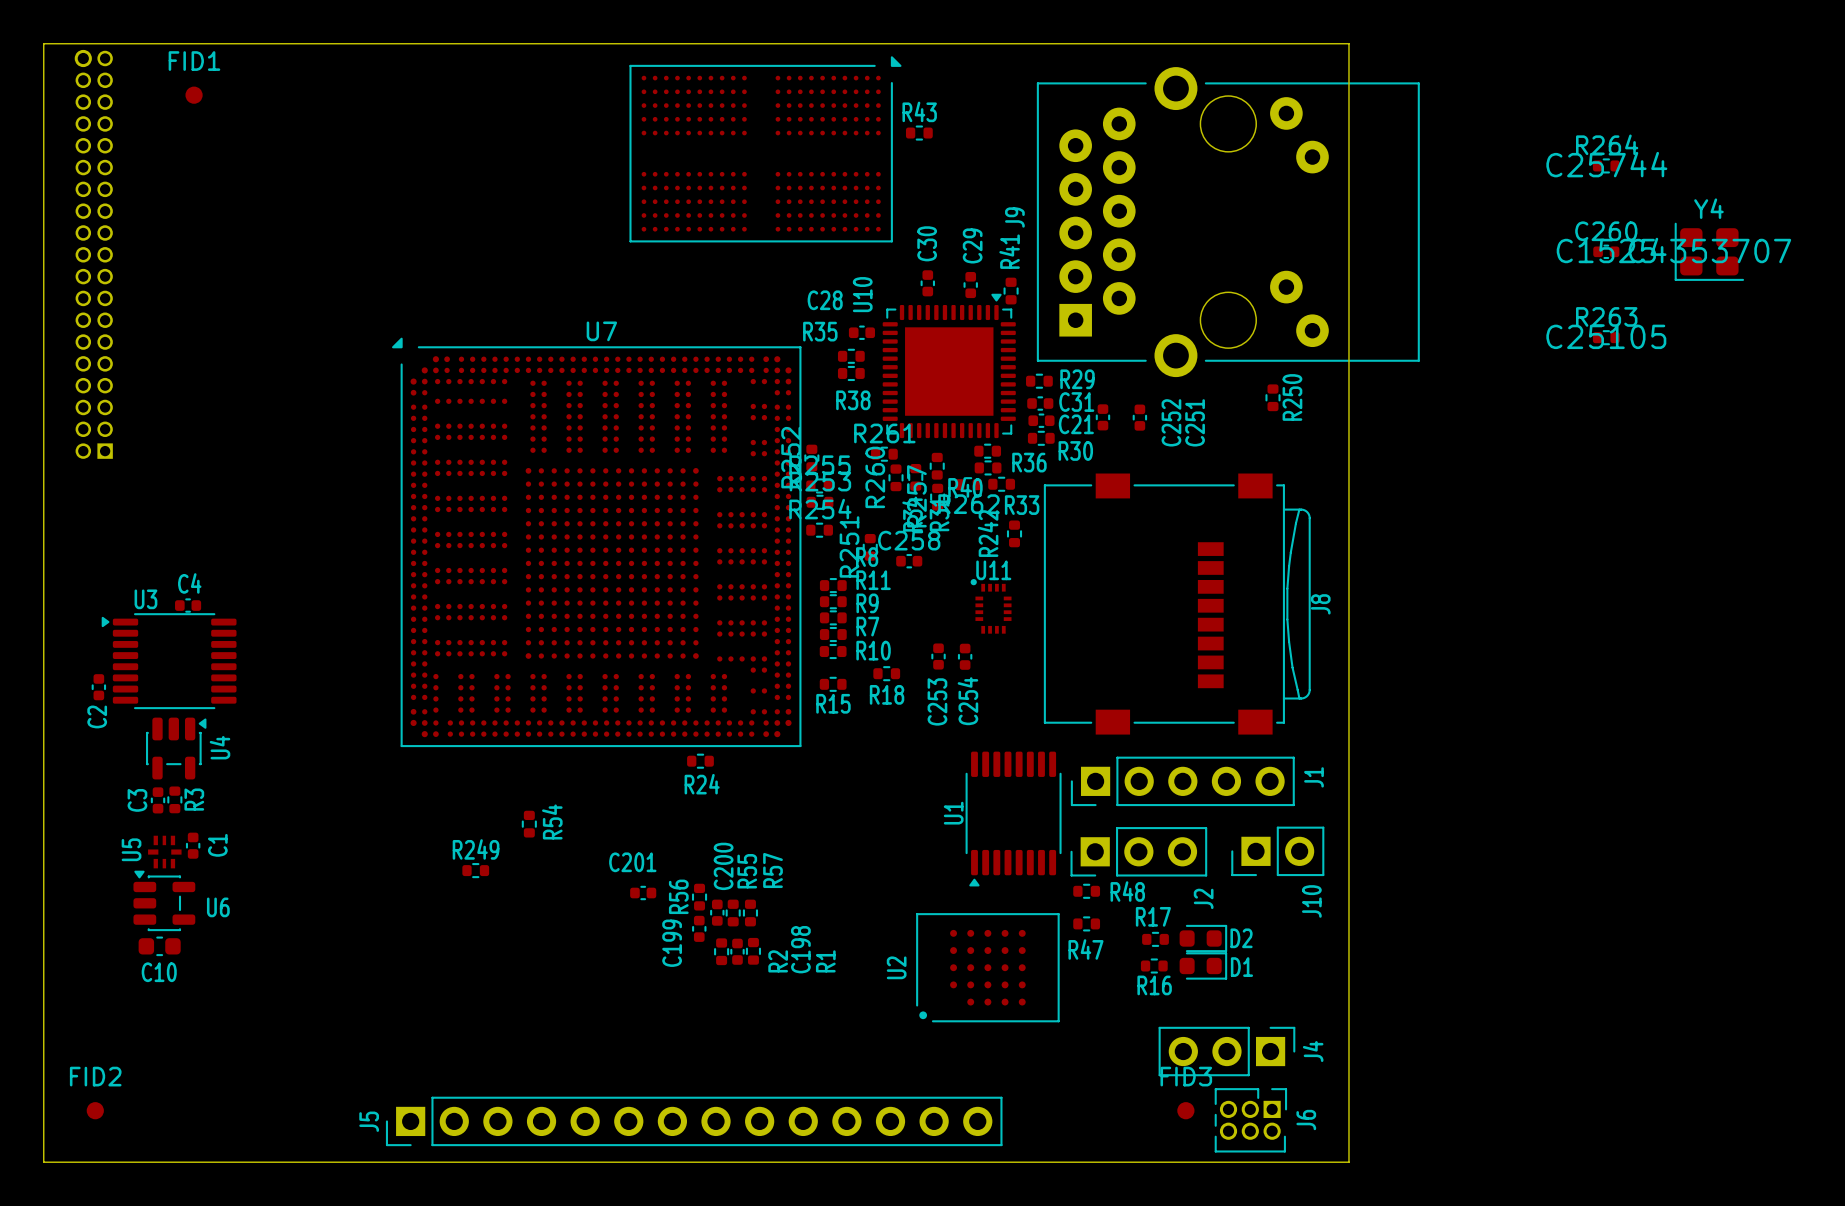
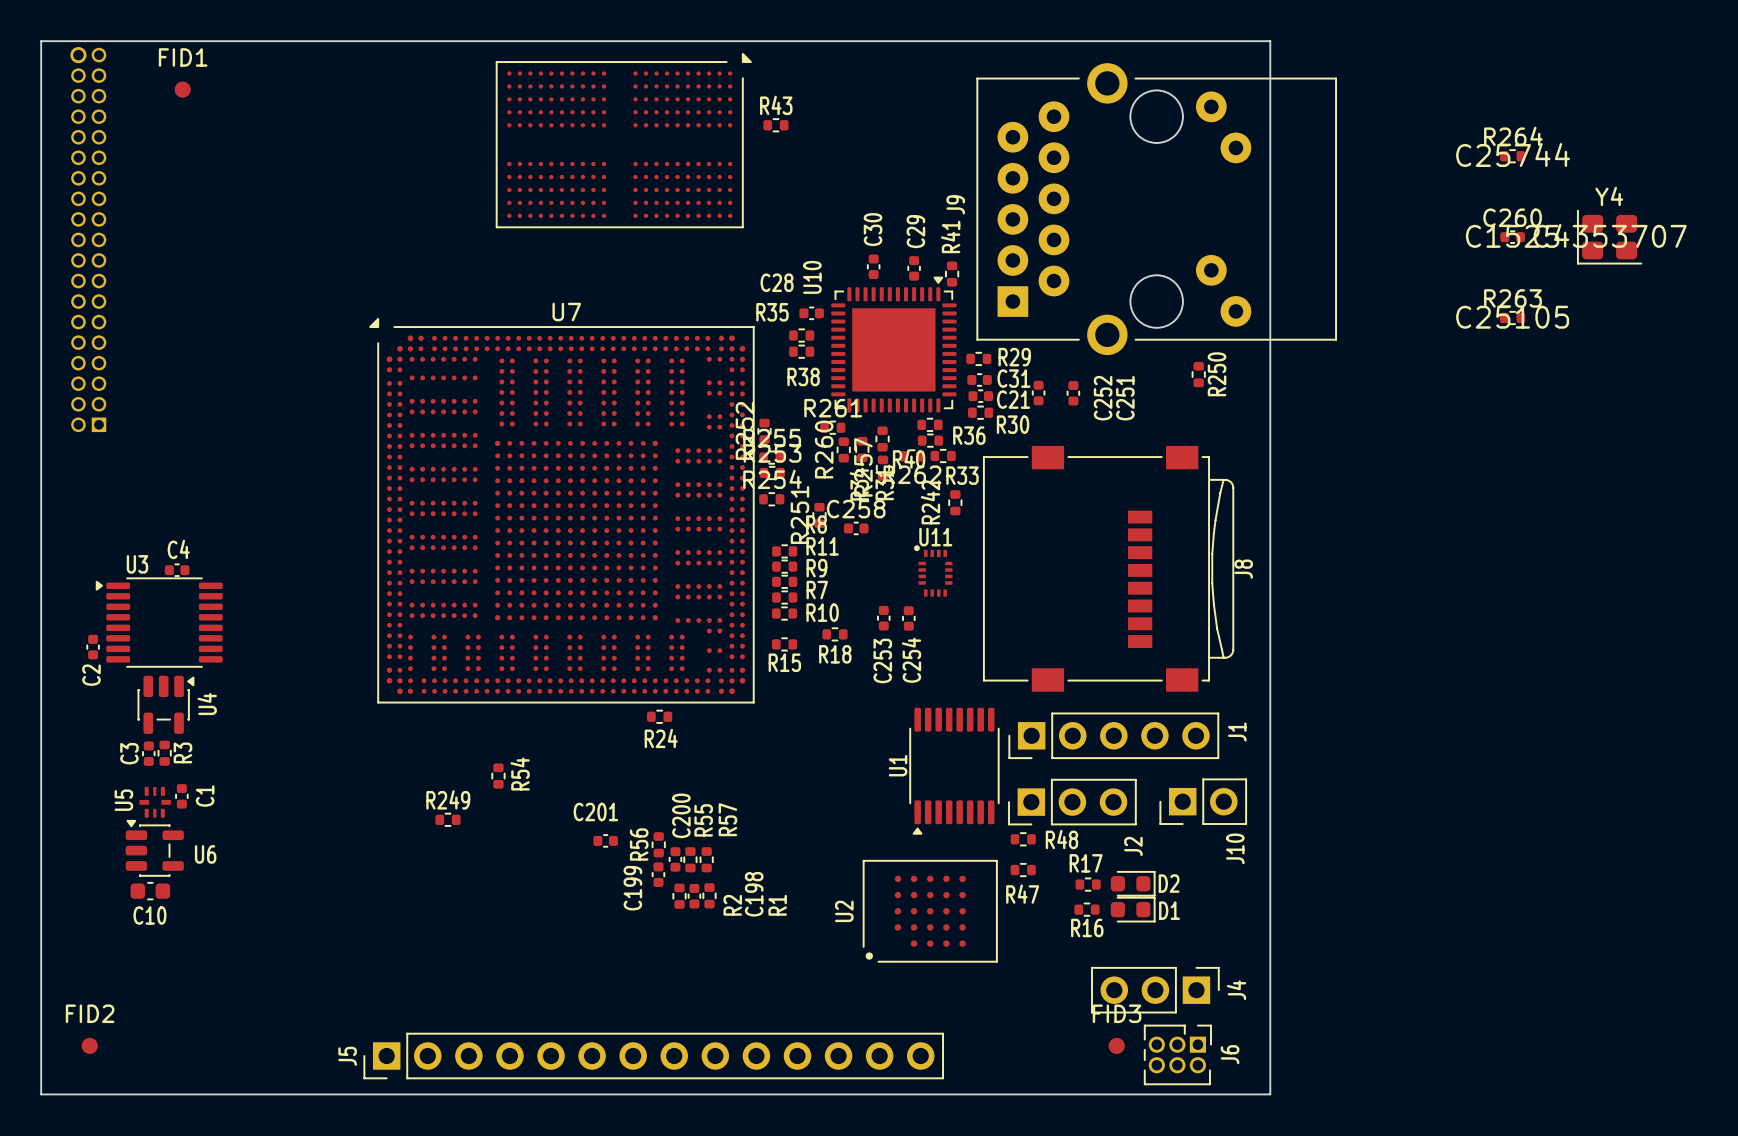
R43 position: (919, 133) -> (775, 125)
part position: (765, 149) -> (623, 140)

